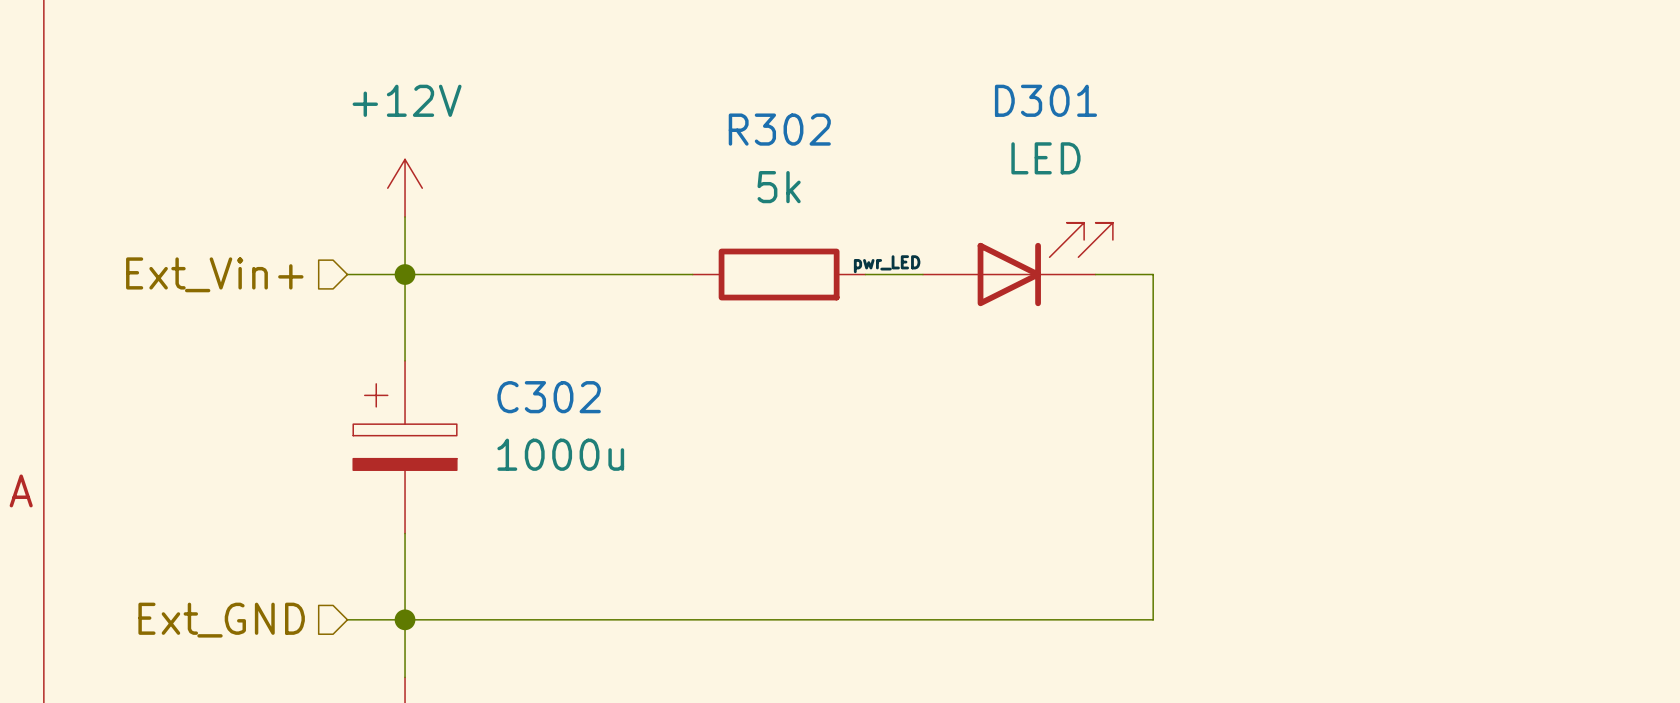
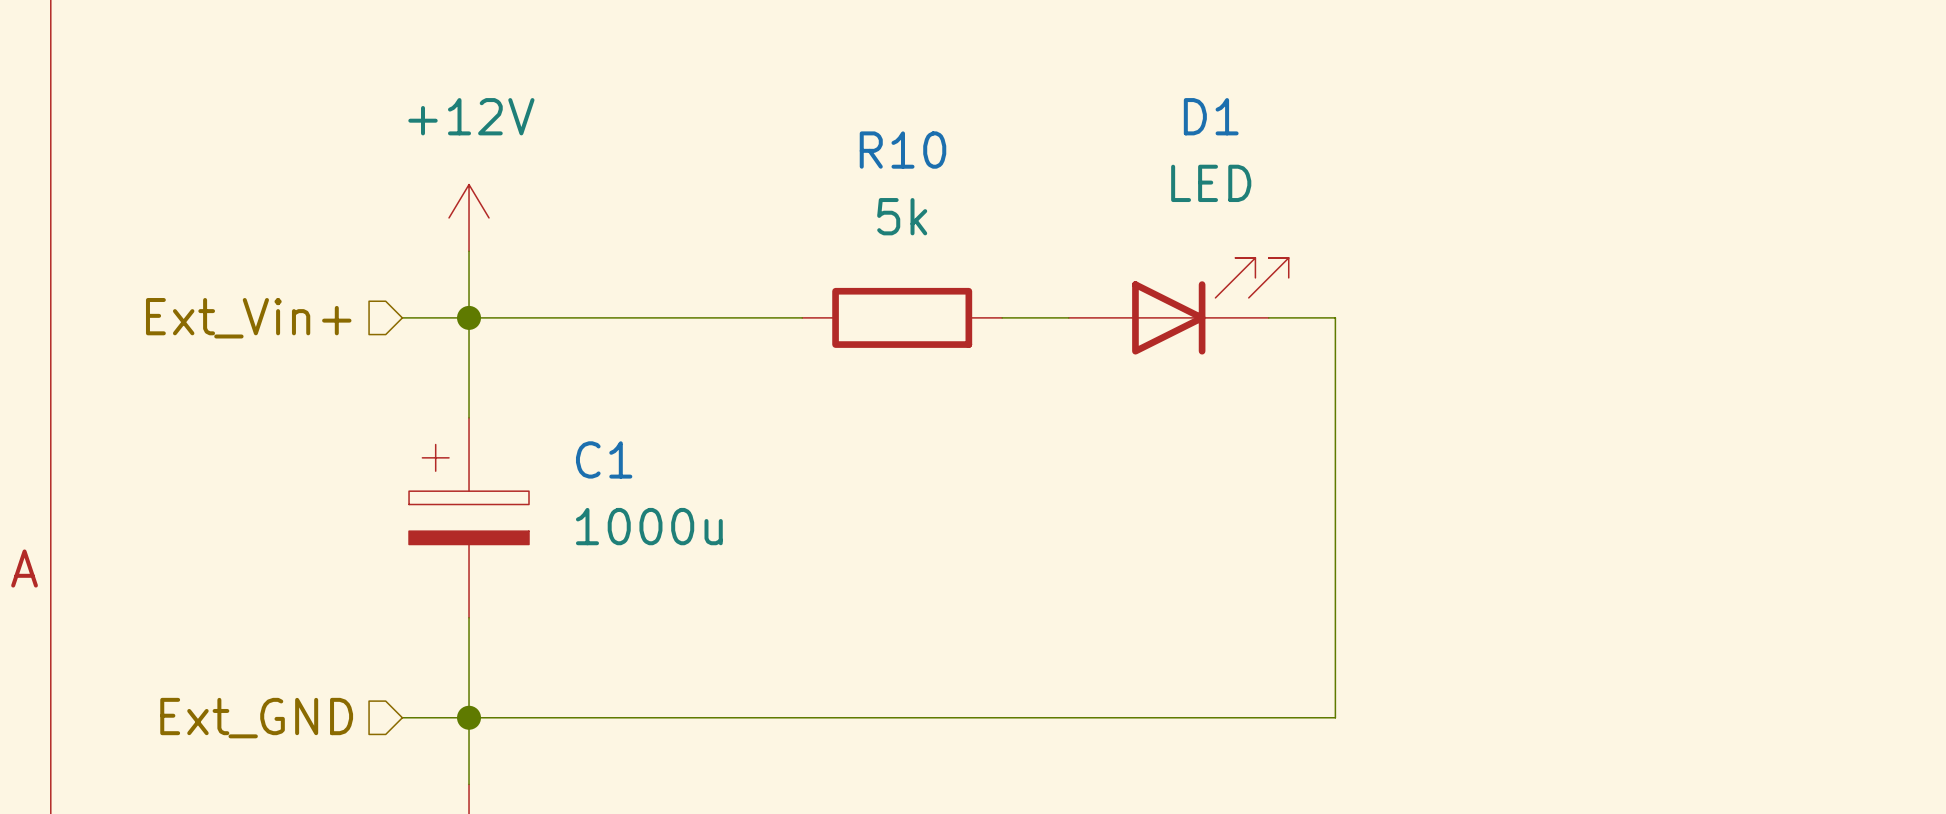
D301 name: D301 (1045, 100) -> D1 (1211, 116)
R302 name: R302 (779, 129) -> R10 (902, 150)
label: pwr_LED (887, 264) -> none
C302 name: C302 (549, 397) -> C1 (604, 459)

